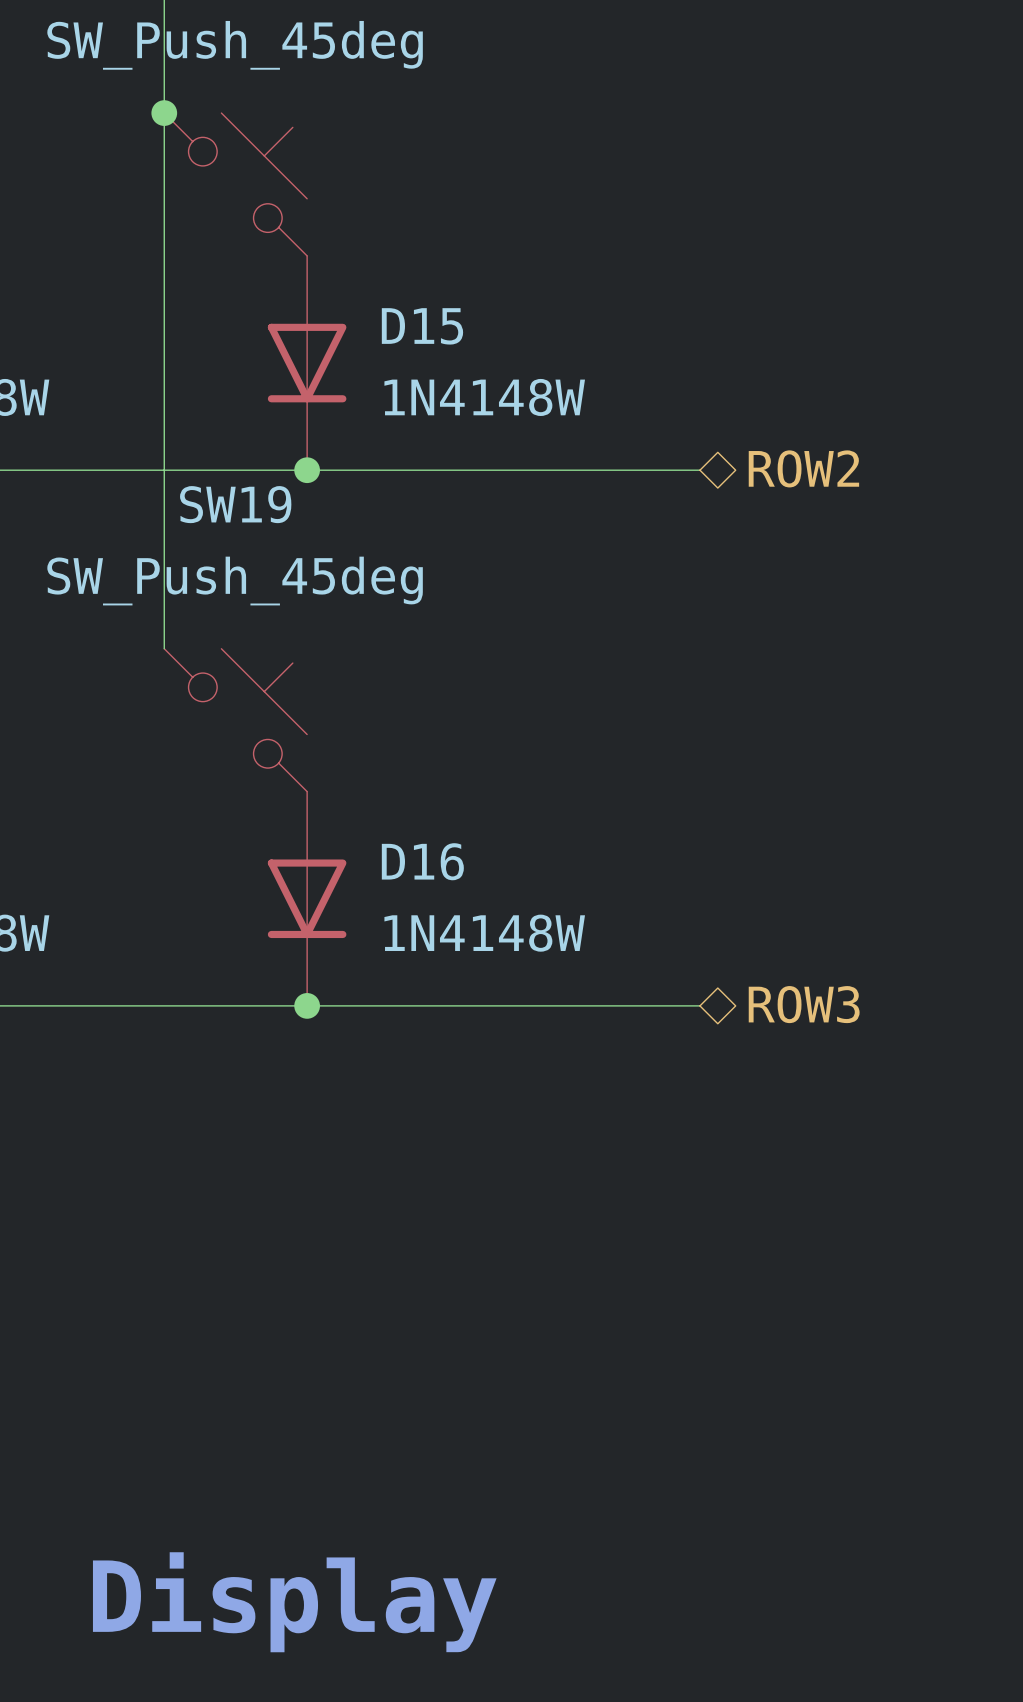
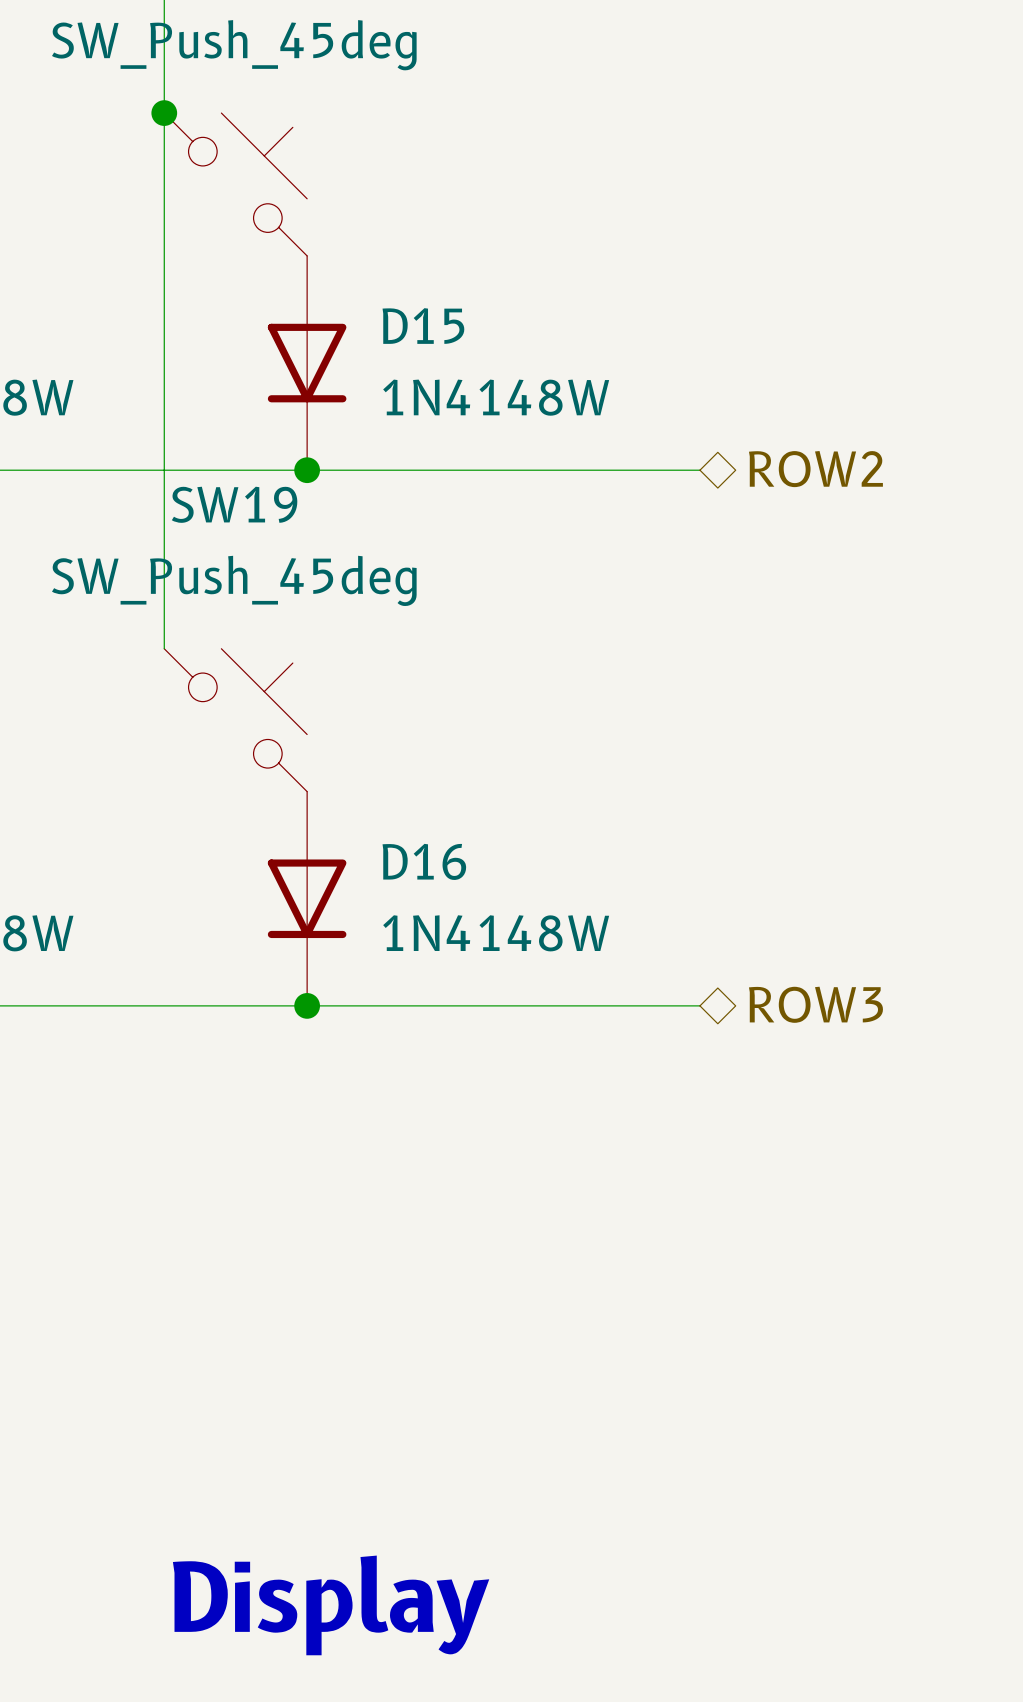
text position: Display (294, 1602) -> Display (331, 1605)

